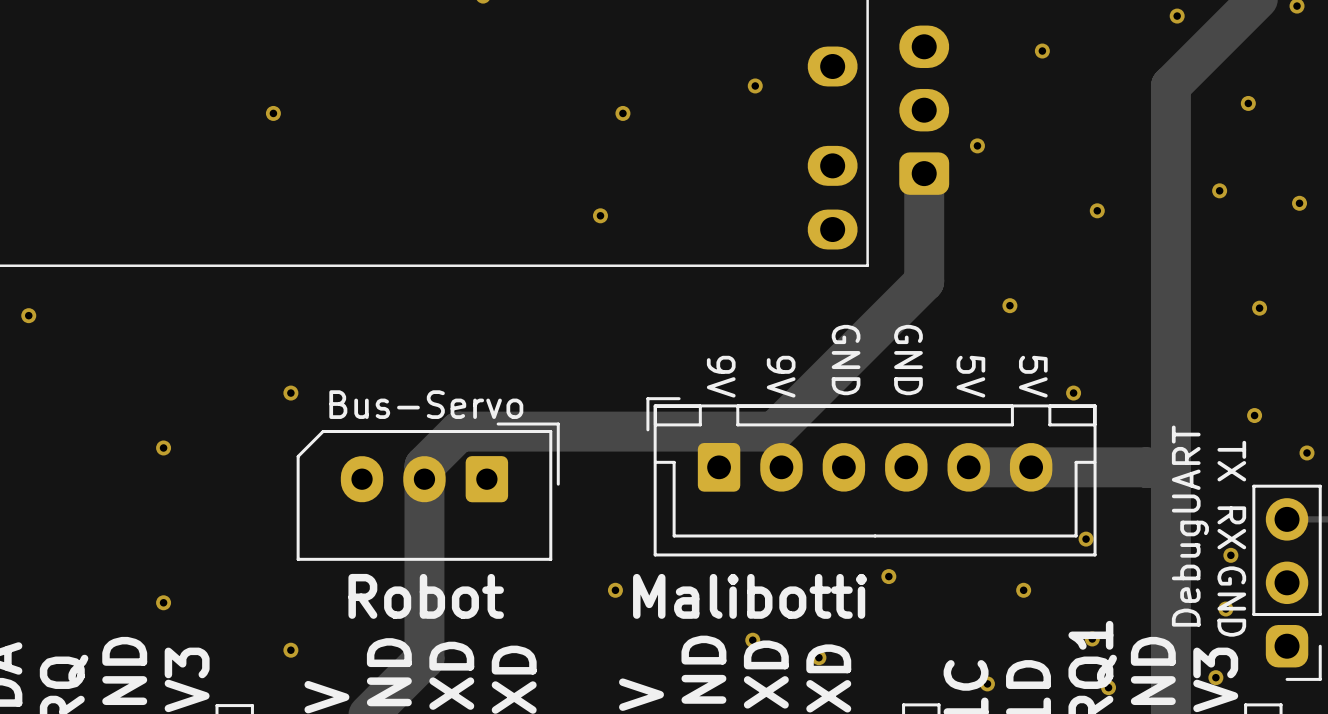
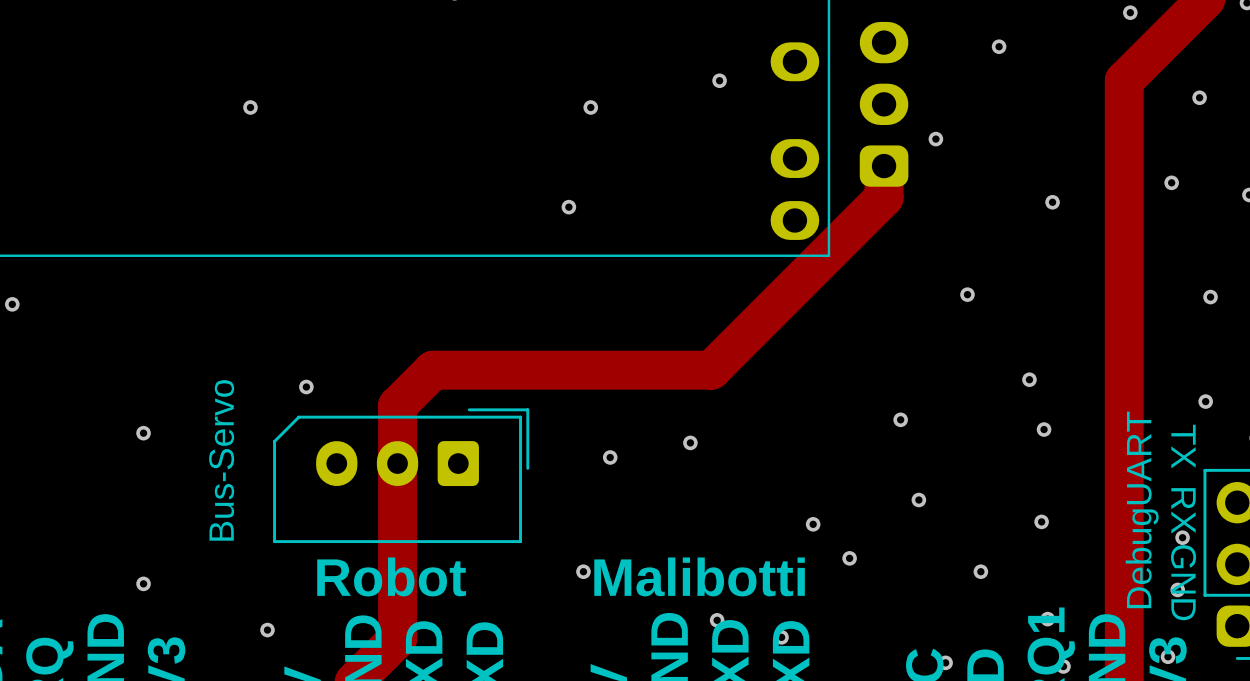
track: (924, 205) (924, 281) (774, 431) (458, 431) (424, 466) -> (884, 197) (711, 370) (433, 370) (397, 405) (397, 450)
text: GND (846, 360) -> none
text: GND (908, 360) -> none
text: 9V (721, 376) -> none
text: 9V (781, 376) -> none
text: 5V (970, 376) -> none
text: 5V (1033, 376) -> none
via position: (290, 393) -> (306, 386)
part value rotation: 0° (426, 404) -> 90° counterclockwise (221, 460)
via: none -> (900, 419)
via: none -> (1044, 429)
via: none -> (690, 442)
track: (968, 467) (1170, 467) -> none
via: none -> (610, 457)
part: (871, 476) -> none
via: none -> (918, 500)
via: none -> (813, 524)

